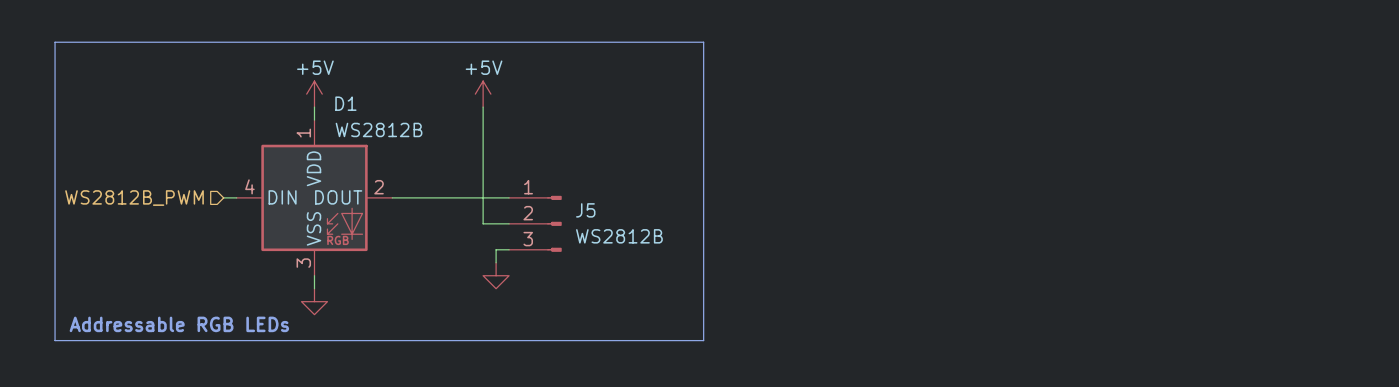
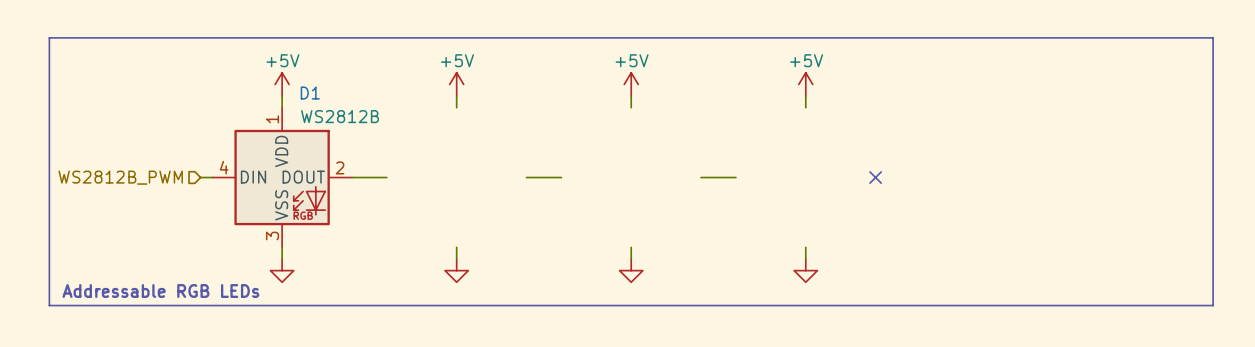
line: (703, 42) (703, 340) -> (631, 37) (1213, 37) (1213, 305) (631, 305)
power symbol position: +5V (483, 94) -> +5V (456, 84)
power symbol: none -> +5V (631, 84)
power symbol: none -> +5V (805, 84)
wire: (483, 107) (483, 223) (509, 223) -> none
wire: none -> (456, 96) (456, 107)
wire: none -> (805, 96) (805, 107)
wire: (431, 197) (509, 197) -> none
wire: none -> (526, 177) (561, 177)
wire: none -> (701, 177) (735, 177)
no-connect mark: none -> (875, 177)
J5: WS2812B (535, 223) -> none
wire: (509, 249) (496, 249) (496, 262) -> none
power symbol position: (496, 275) -> (456, 270)
wire: none -> (456, 247) (456, 258)
wire: none -> (805, 247) (805, 258)
power symbol: none -> (631, 270)
power symbol: none -> (805, 270)

